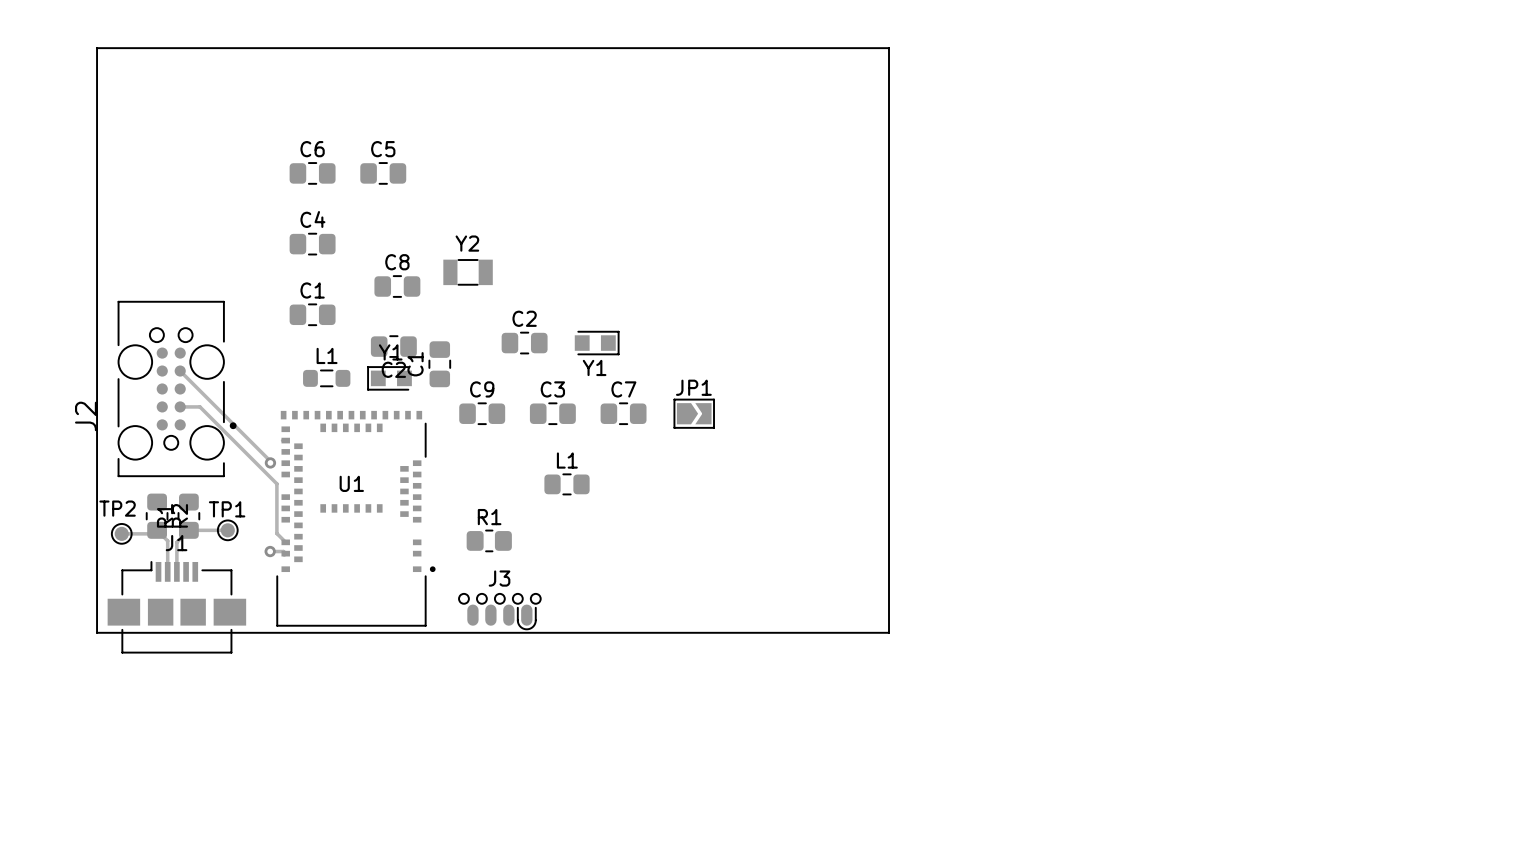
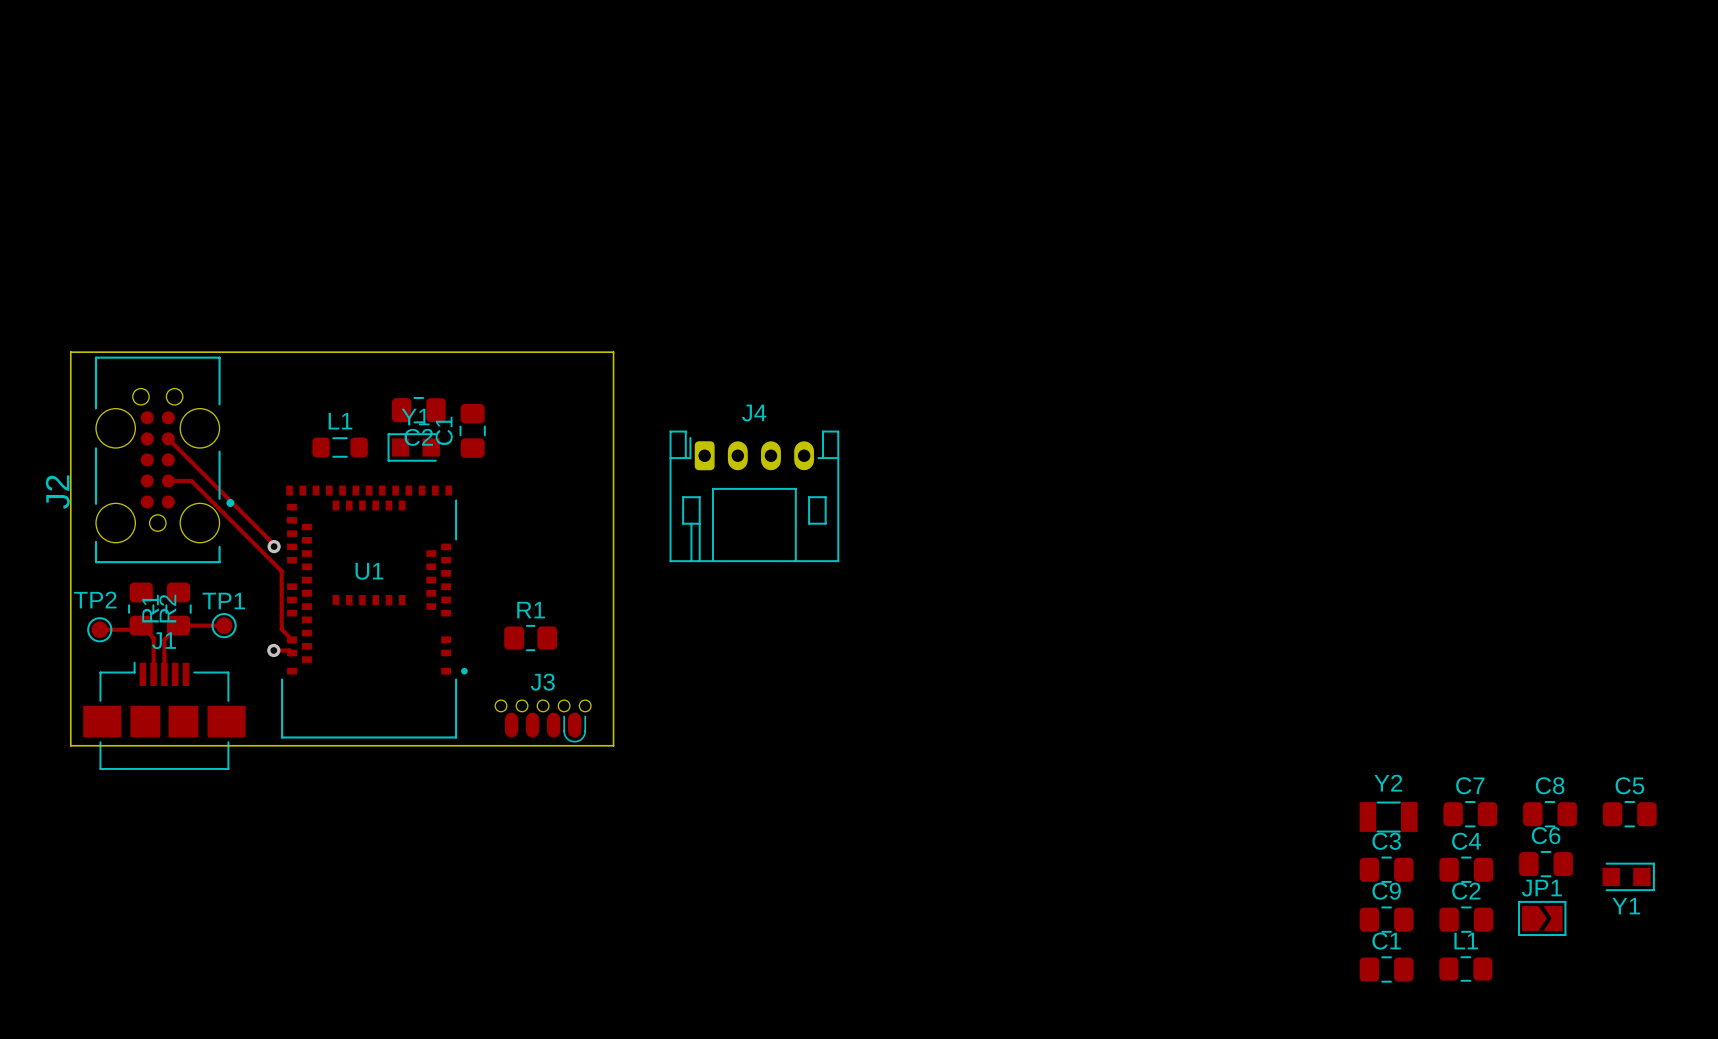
C6 position: (312, 173) -> (1546, 864)
C5 position: (383, 173) -> (1629, 814)
C4 position: (312, 244) -> (1466, 869)
Y2 position: (468, 272) -> (1388, 817)
C8 position: (397, 286) -> (1550, 814)
board edge: (97, 297) (97, 48) (889, 48) (889, 632) (559, 632) -> (70, 352) (613, 352) (613, 745)
C1: (312, 314) -> none
C2: (524, 343) -> none
Y1: (597, 343) -> none
C9 position: (482, 413) -> (1386, 919)
C3 position: (552, 413) -> (1386, 869)
C7 position: (623, 413) -> (1470, 814)
JP1 position: (694, 413) -> (1542, 918)
J4: none -> (754, 496)
L1: (567, 484) -> none
Y1: none -> (1628, 876)
C2: none -> (1466, 919)
C1: none -> (1386, 969)
L1: none -> (1465, 969)

